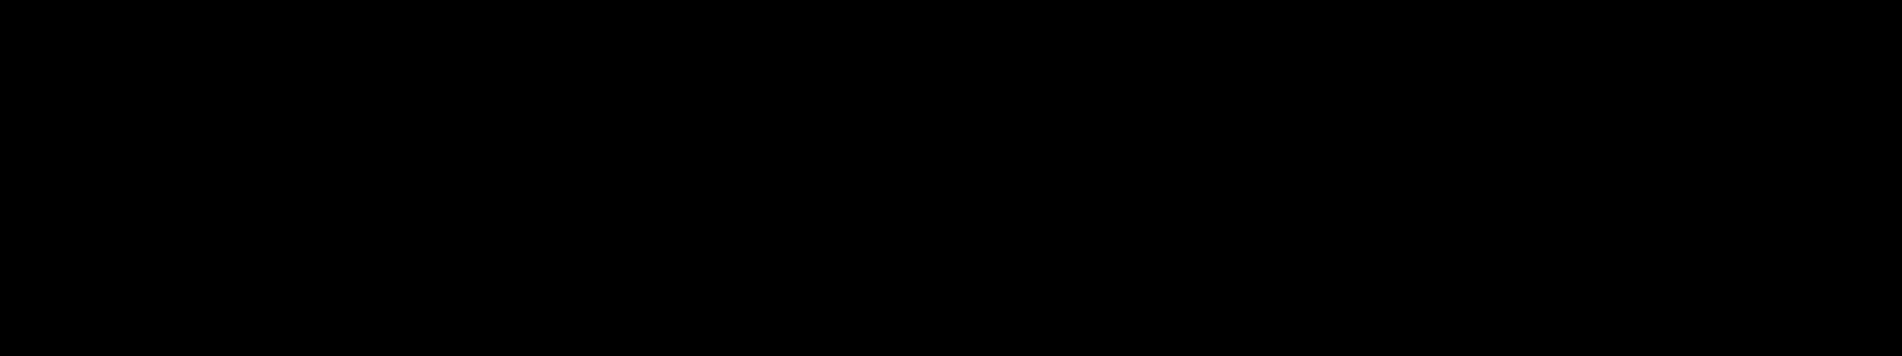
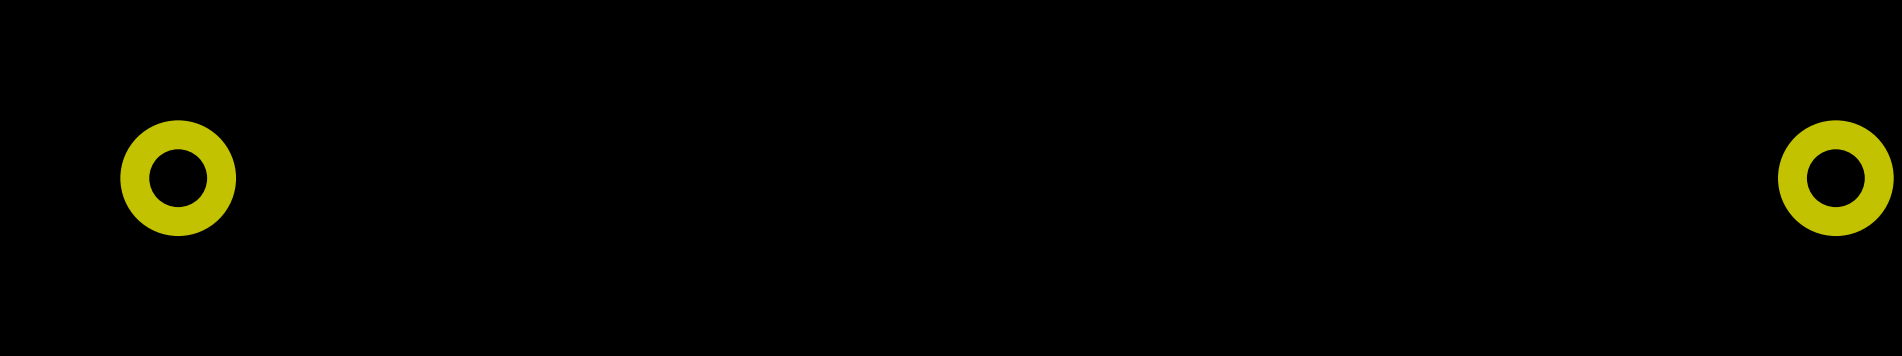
part: none -> (178, 178)
part: none -> (1835, 178)

